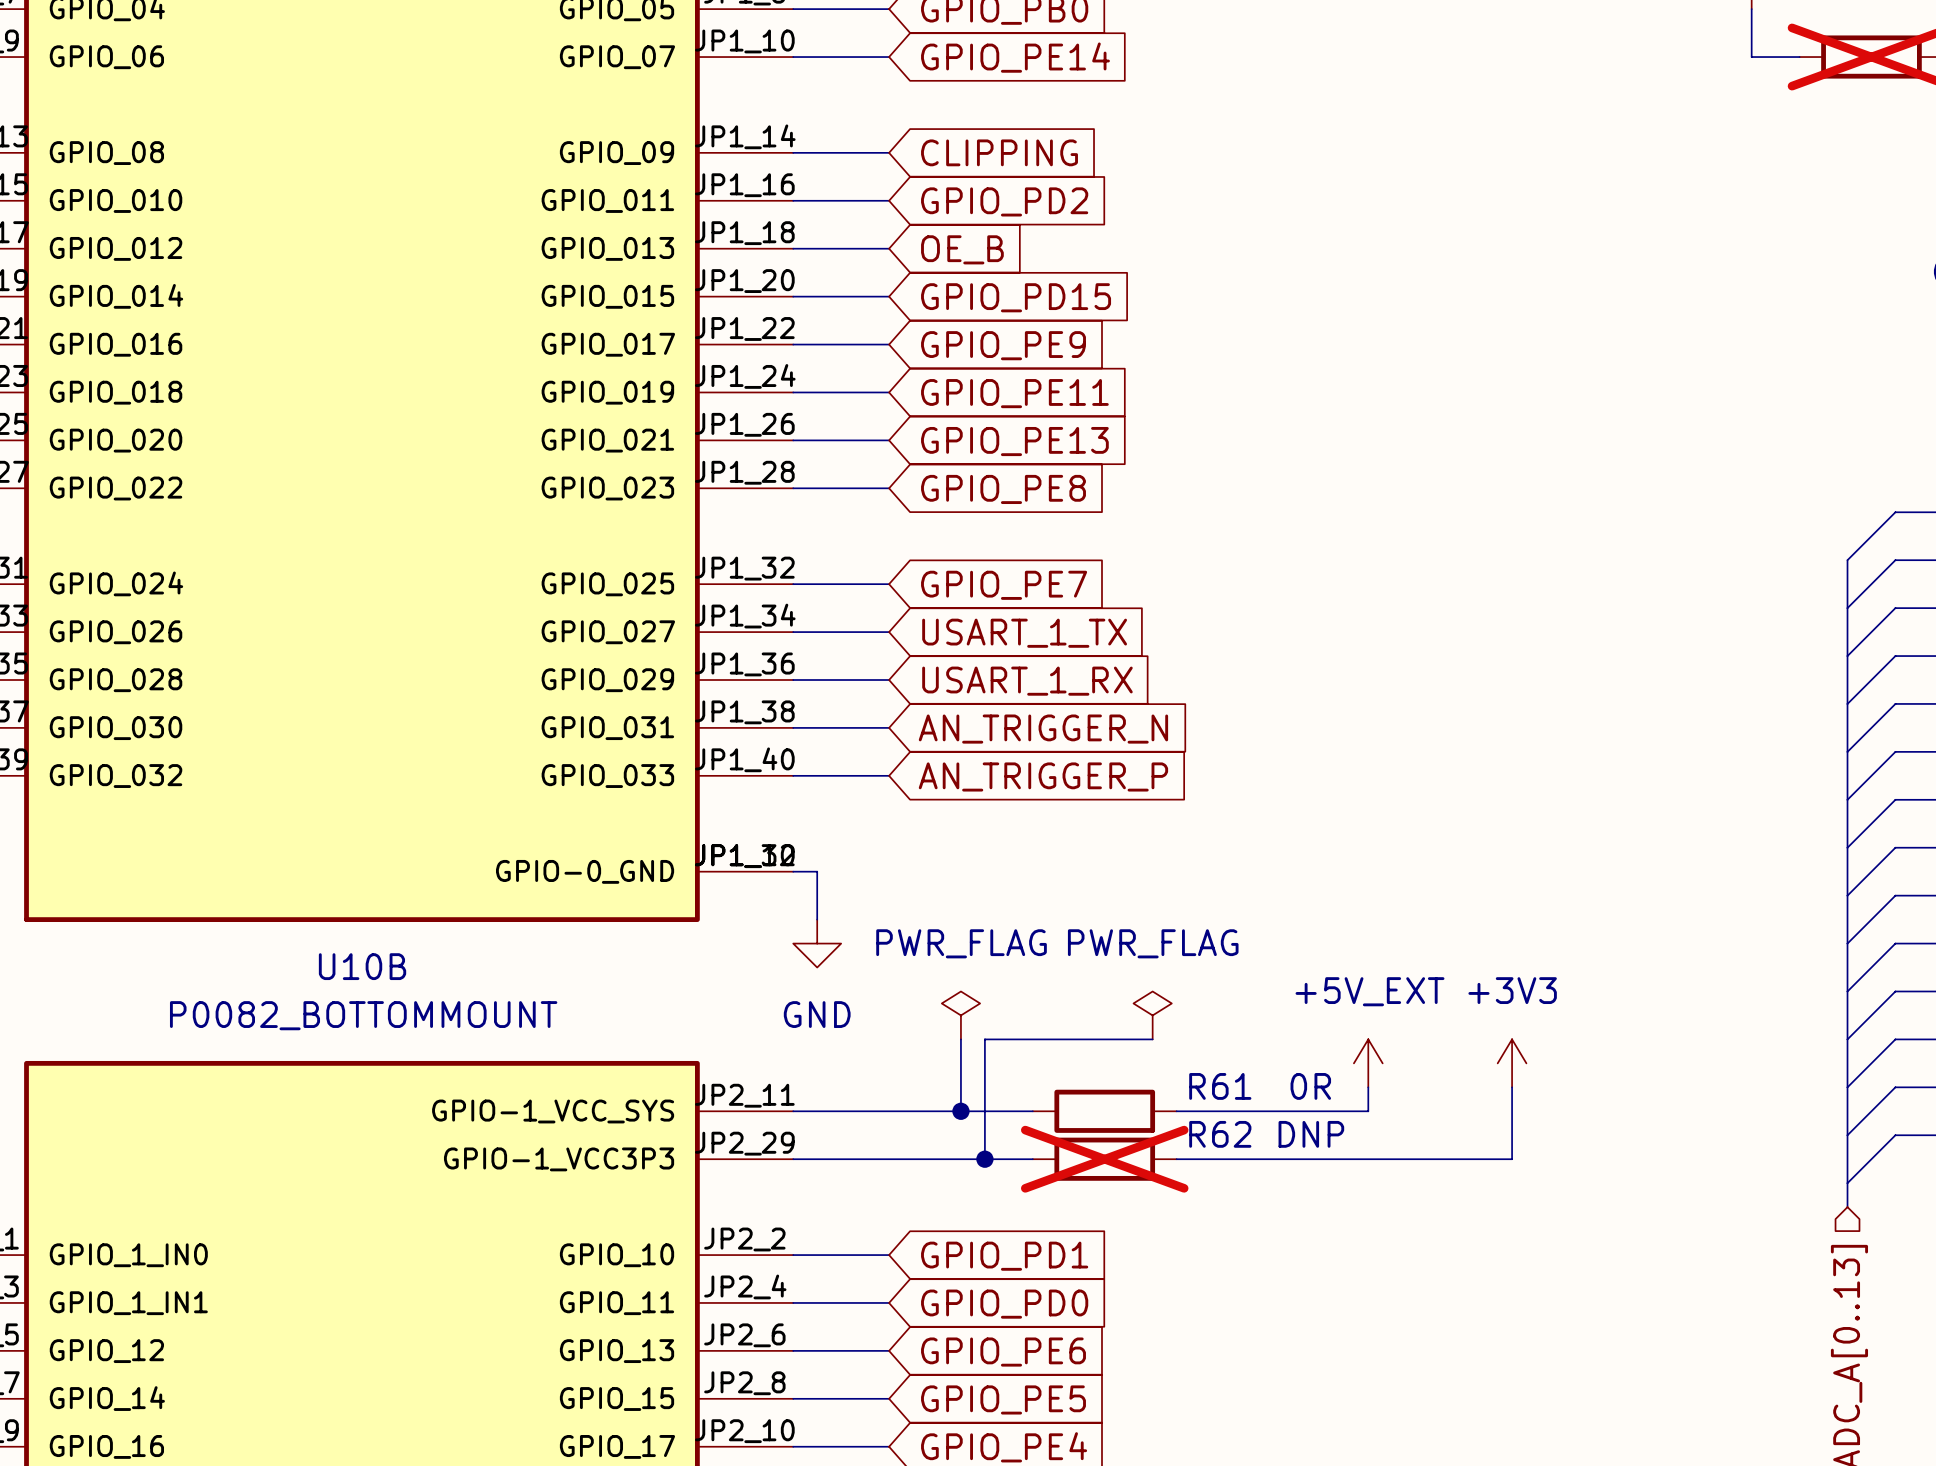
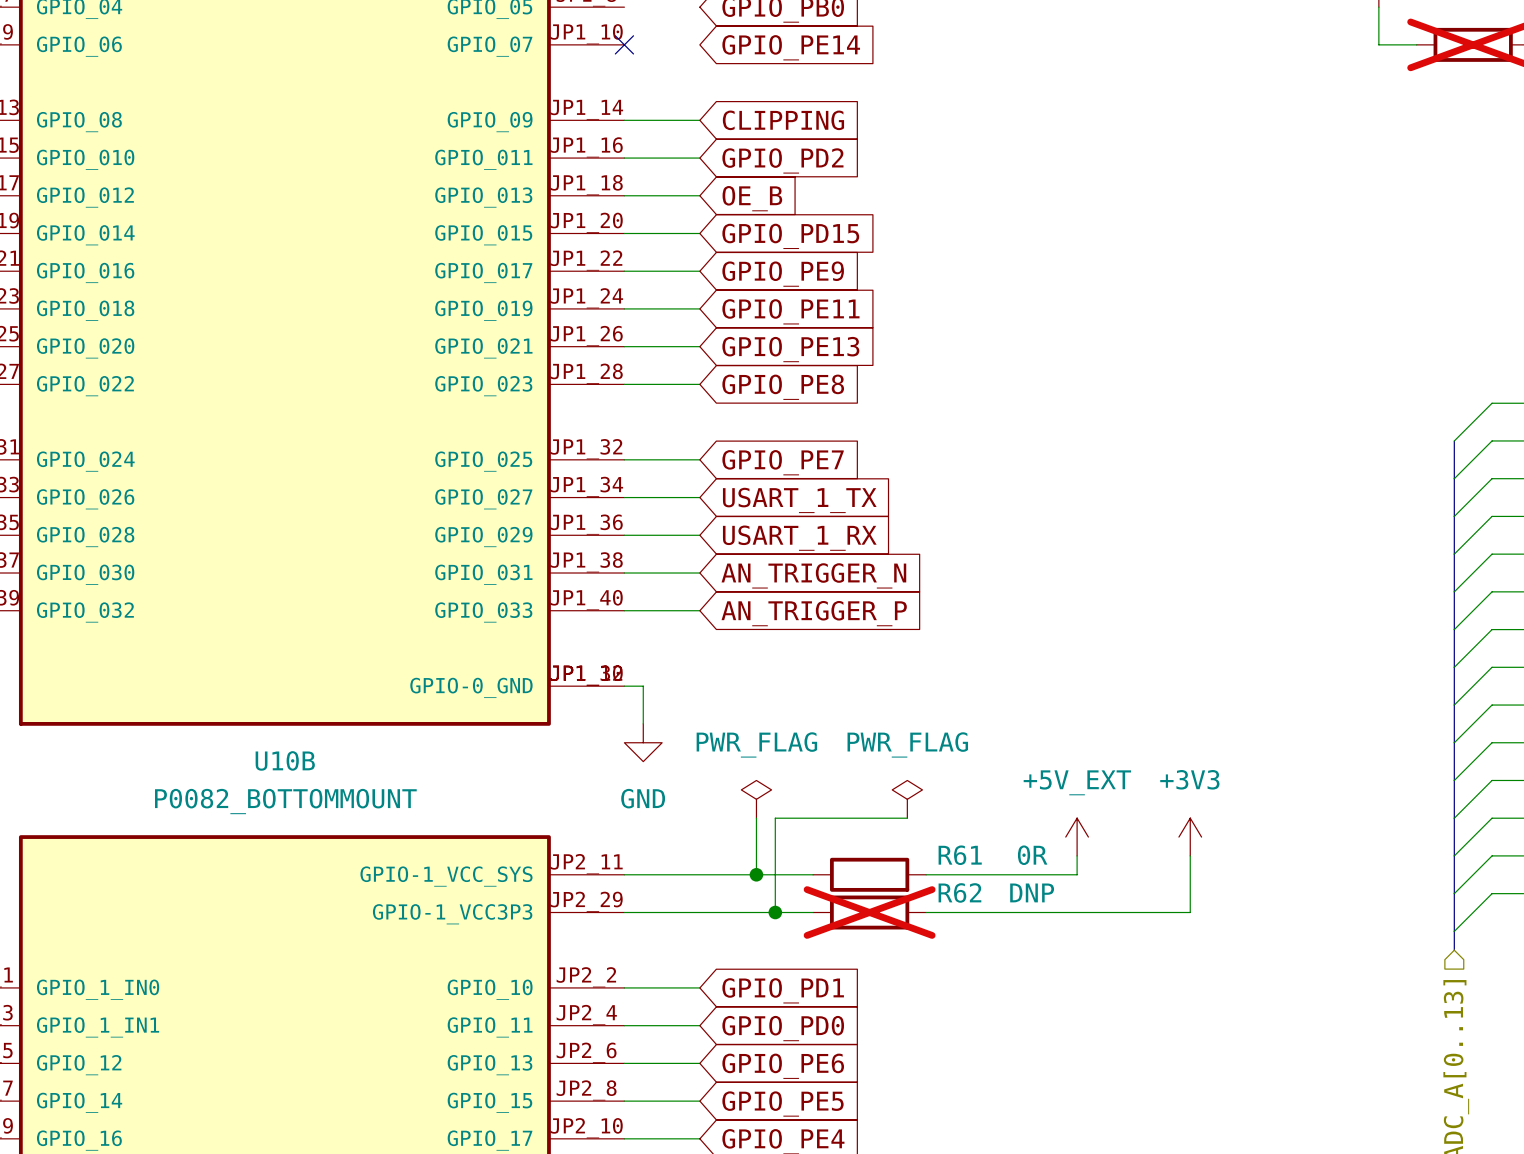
wire: (793, 9) (889, 9) -> none
wire: (793, 57) (889, 57) -> none
no-connect mark: none -> (624, 44)

